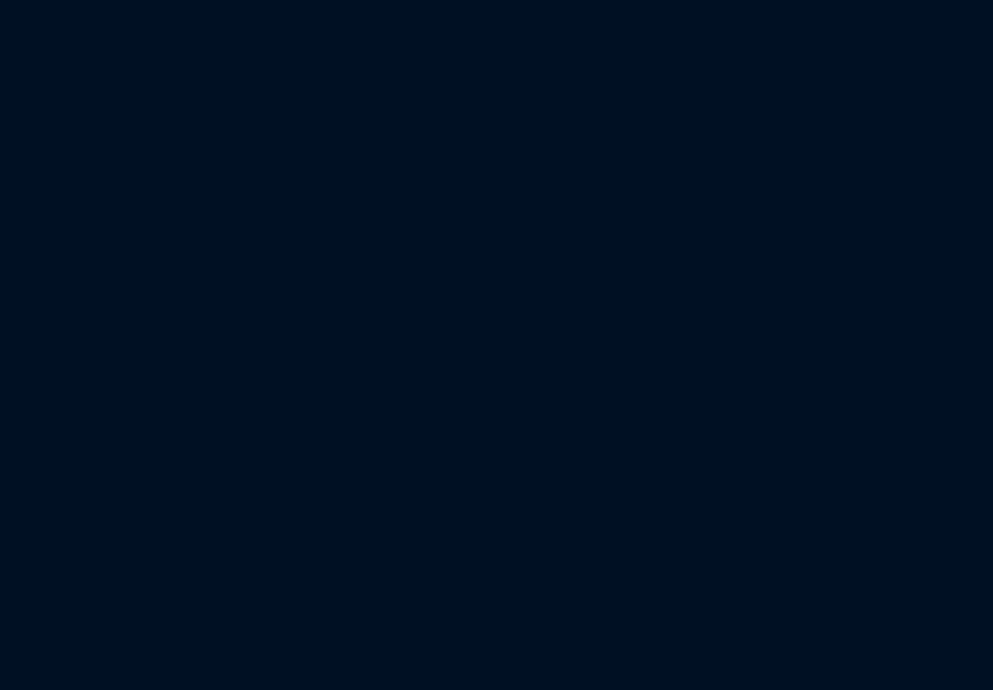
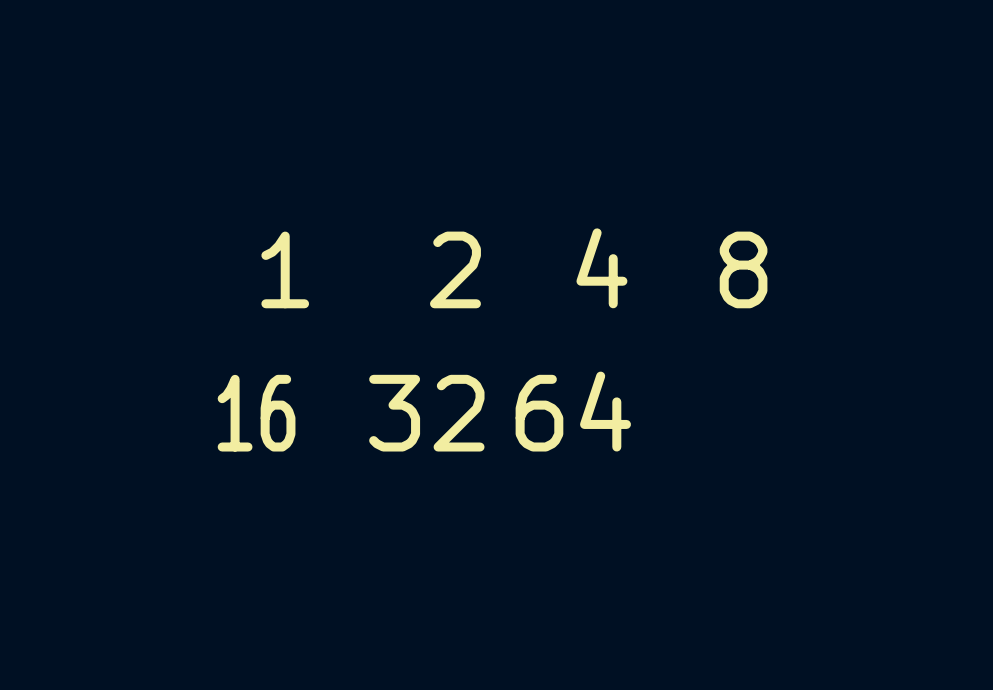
text: none -> 1 (285, 269)
text: none -> 2 (455, 269)
text: none -> 4 (601, 268)
text: none -> 8 (743, 269)
text: none -> 16 (256, 413)
text: none -> 32 (426, 413)
text: none -> 64 (573, 411)

